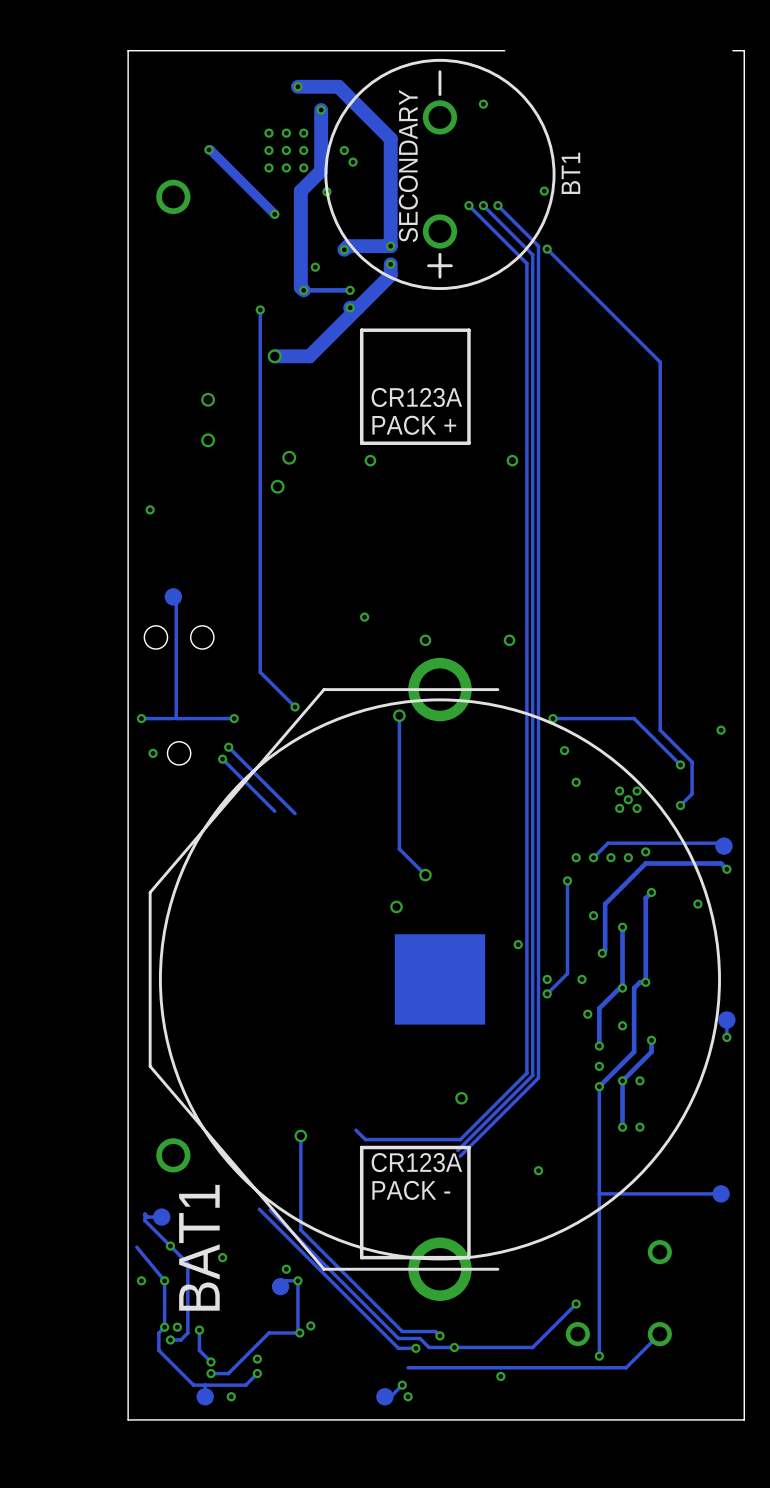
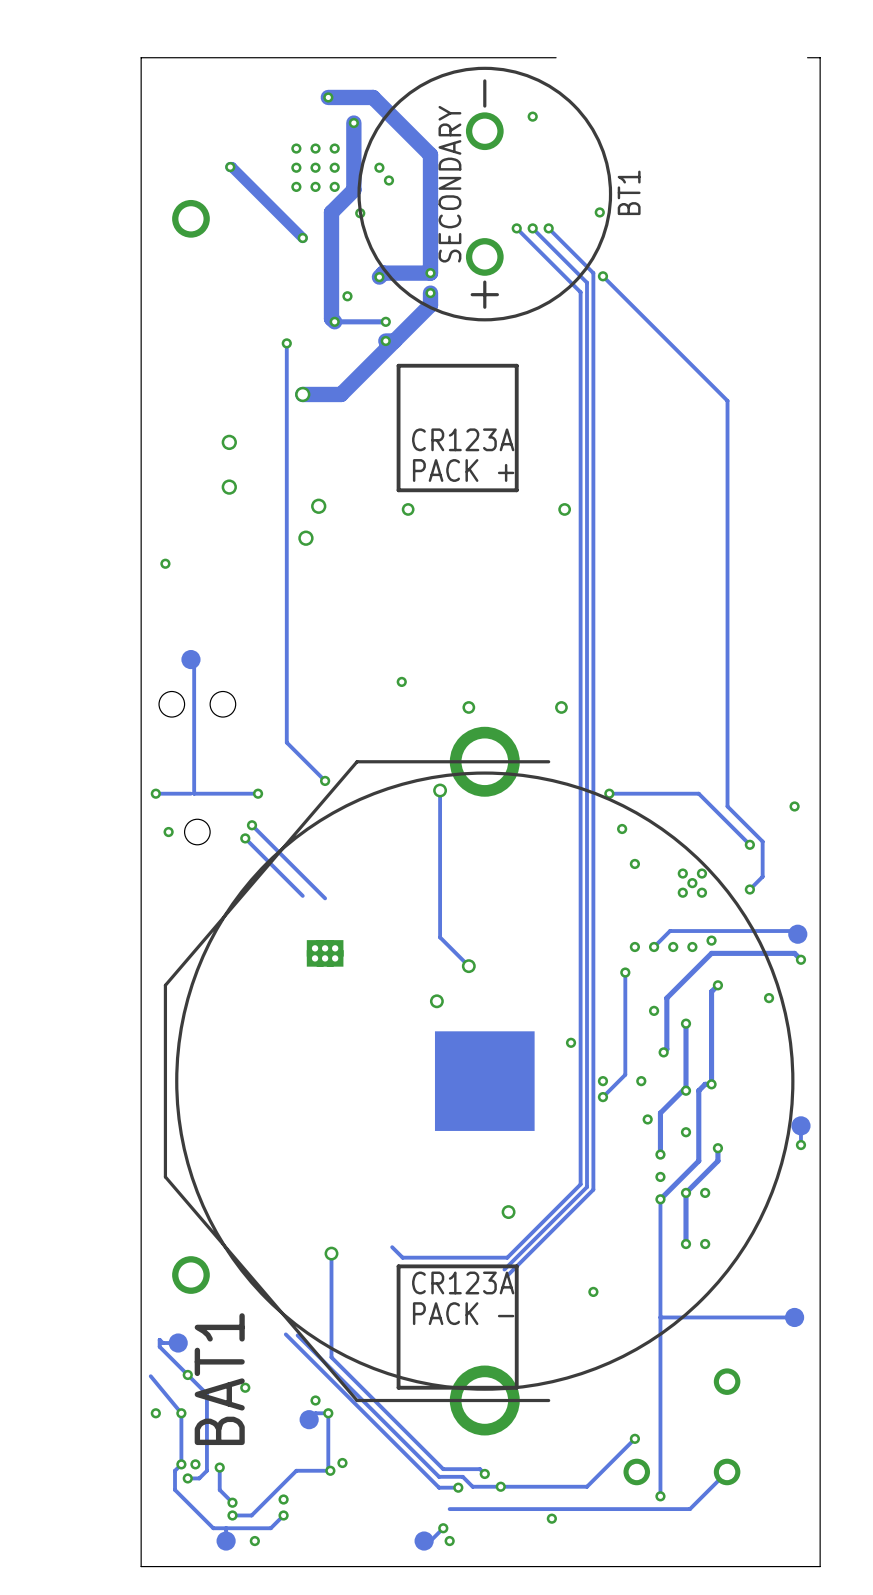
part: none -> (325, 953)

